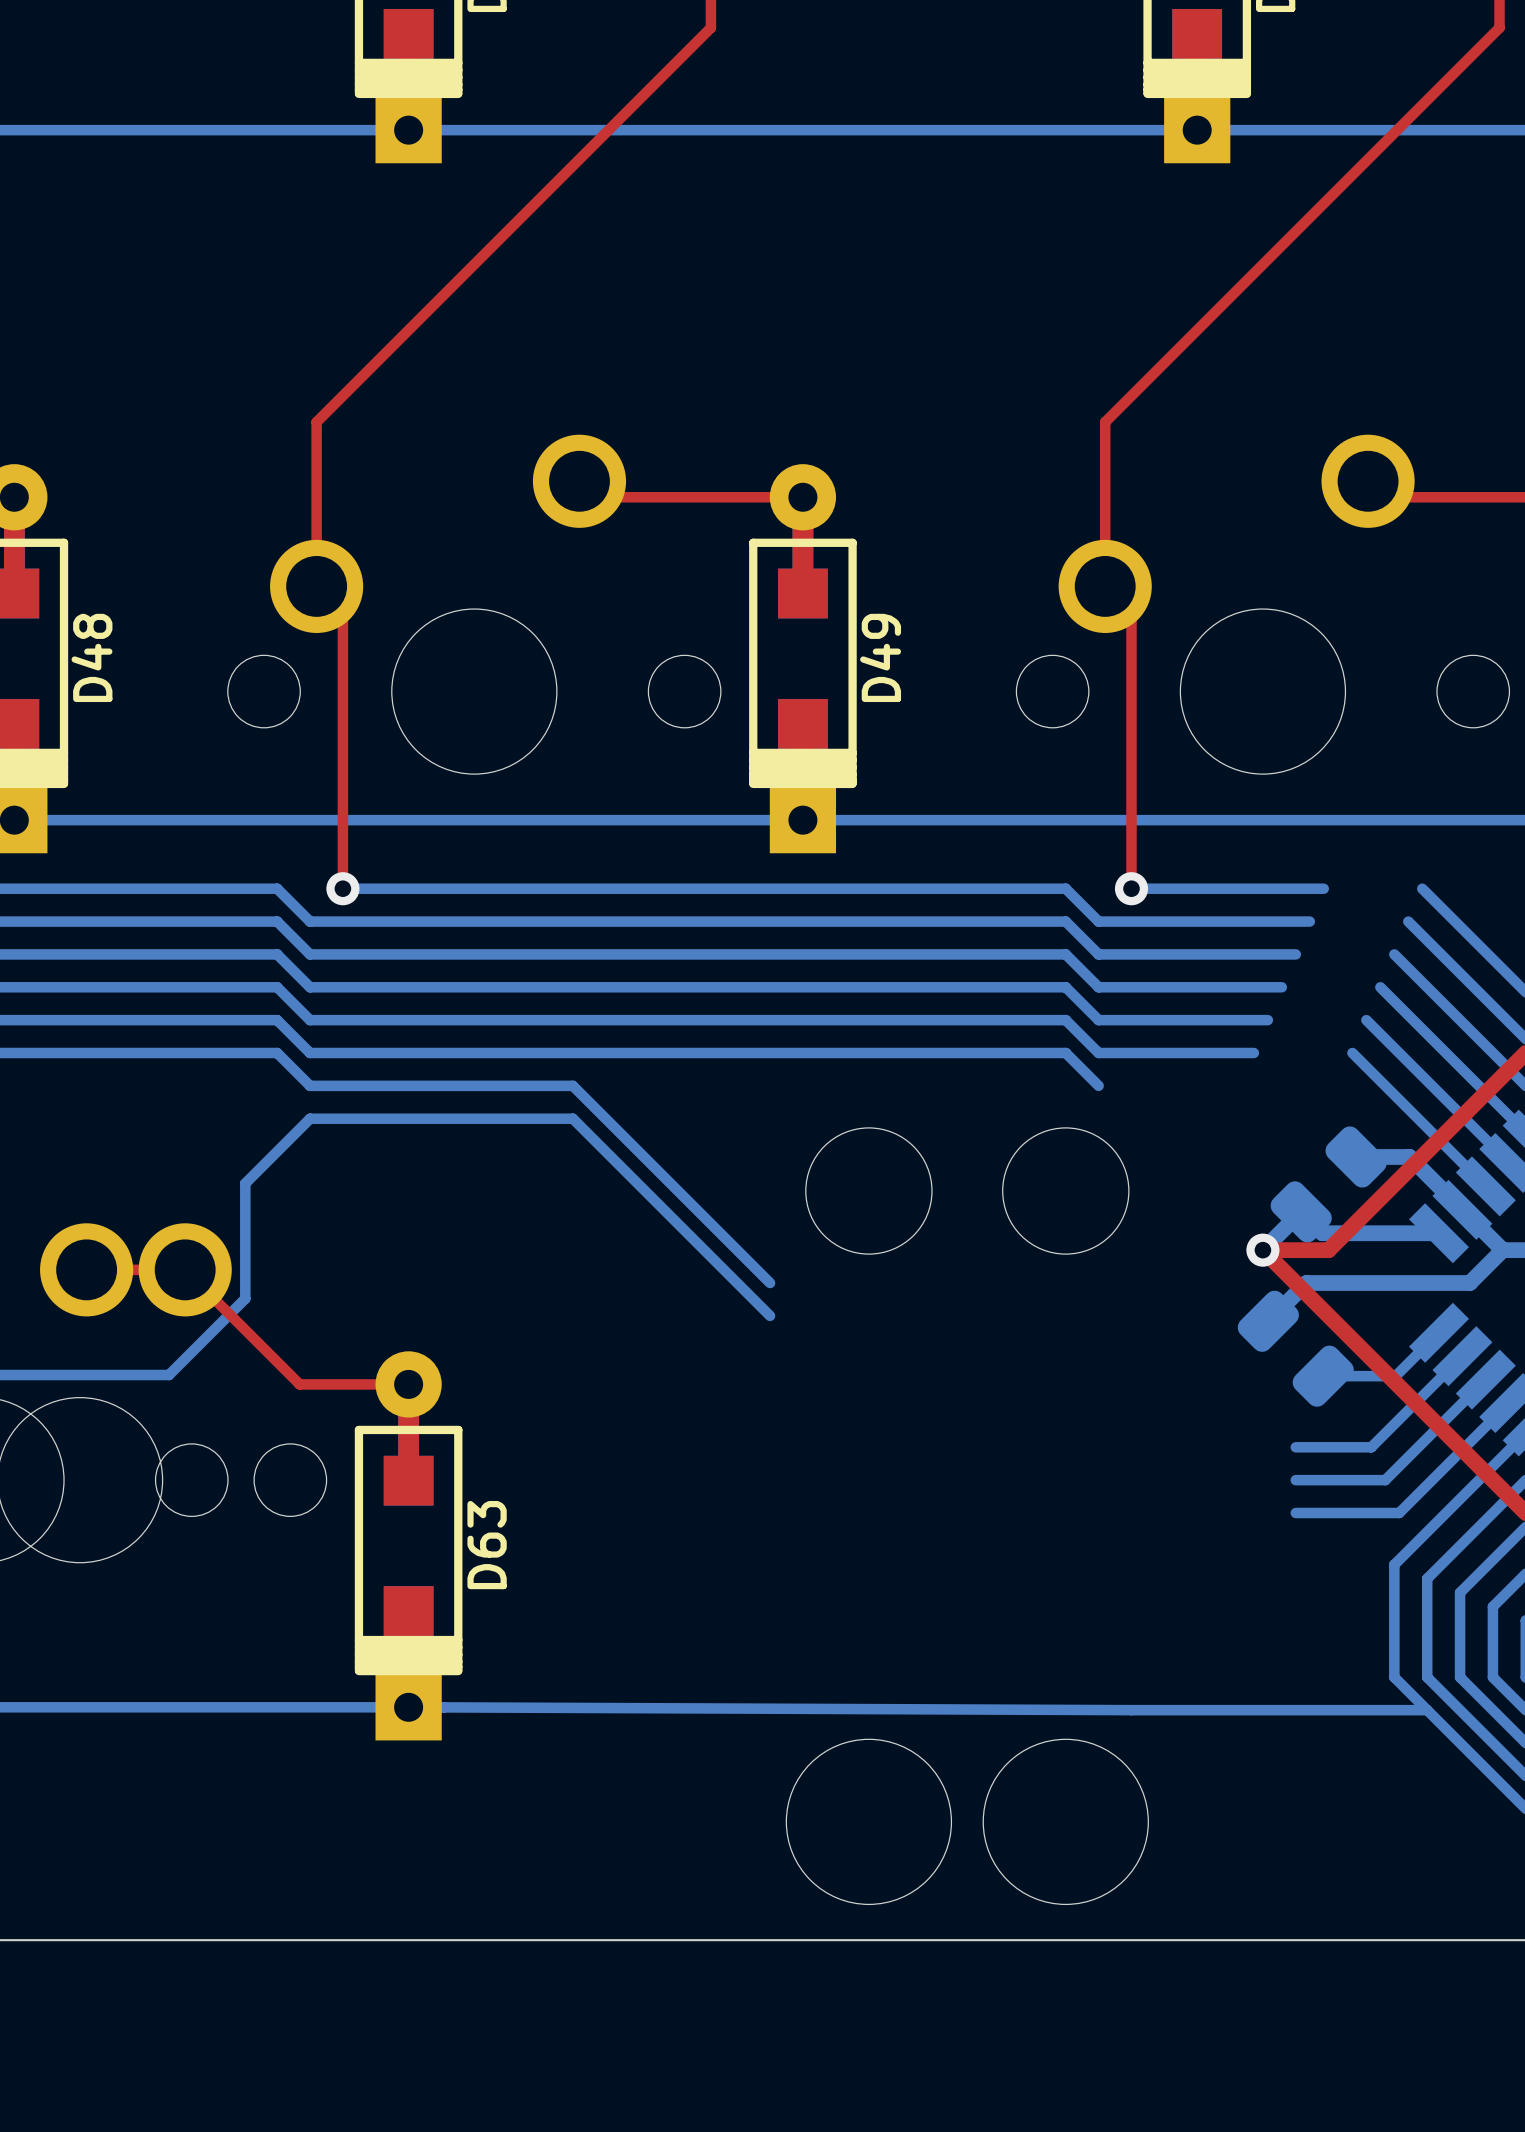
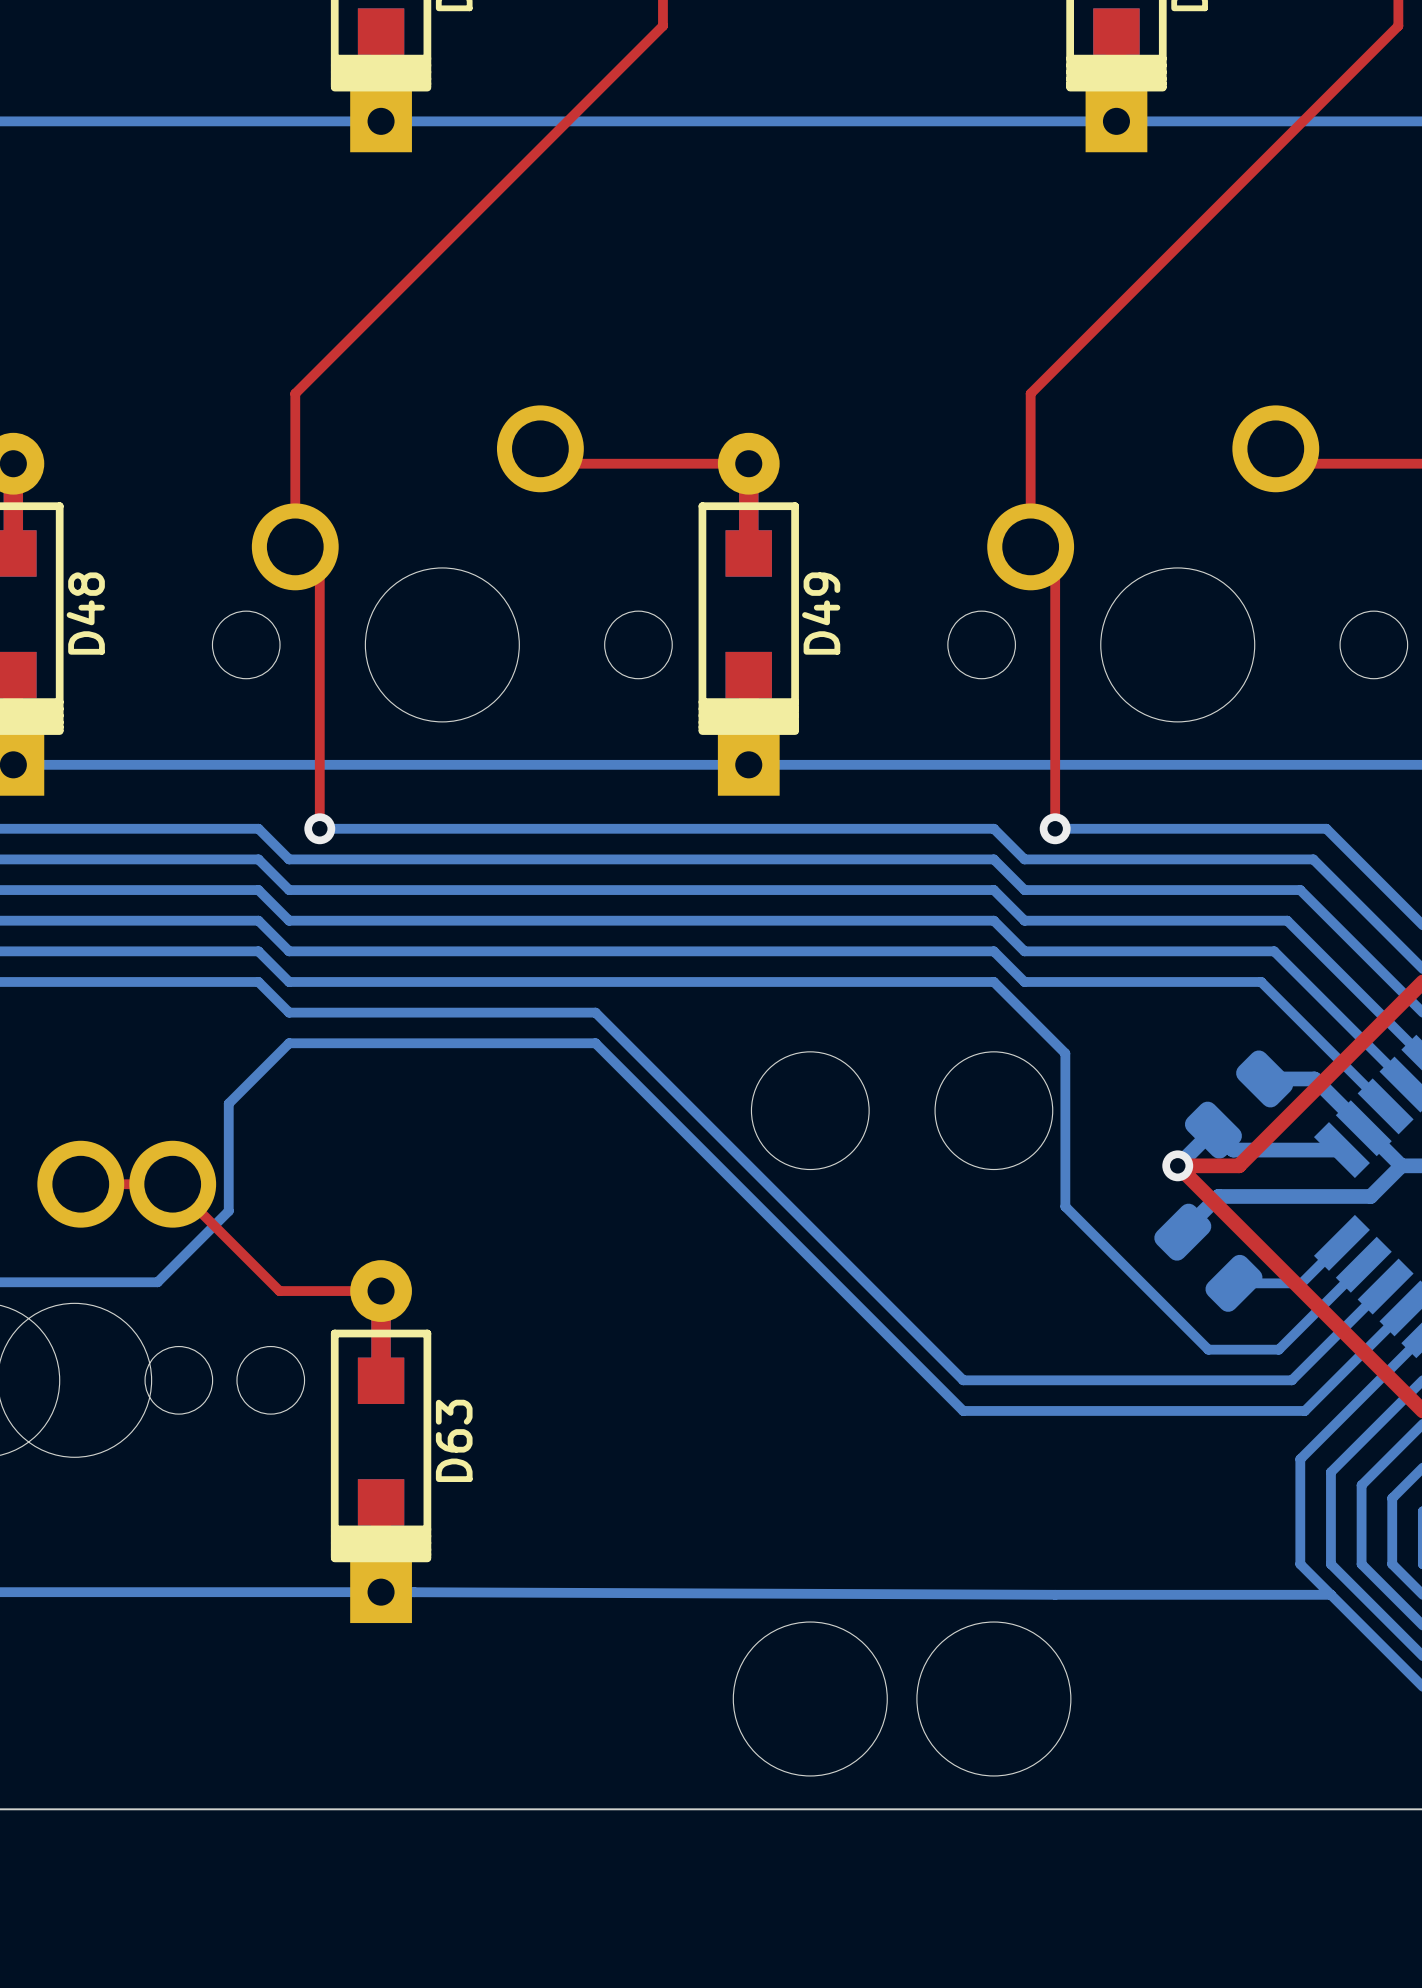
bottom track: none -> (1234, 828) (1326, 828)
bottom track: none -> (1221, 859) (1313, 859)
bottom track: none -> (1208, 890) (1300, 890)
bottom track: none -> (1195, 920) (1287, 920)
bottom track: none -> (1182, 951) (1274, 951)
bottom track: none -> (1169, 981) (1261, 981)
bottom track: (572, 1085) (770, 1283) -> (534, 1012) (595, 1012) (963, 1380) (1208, 1380)
bottom track: none -> (1024, 1012) (1065, 1053) (1065, 1206) (1208, 1349)
bottom track: (572, 1118) (770, 1315) -> (534, 1043) (595, 1043) (963, 1410) (1208, 1410)

